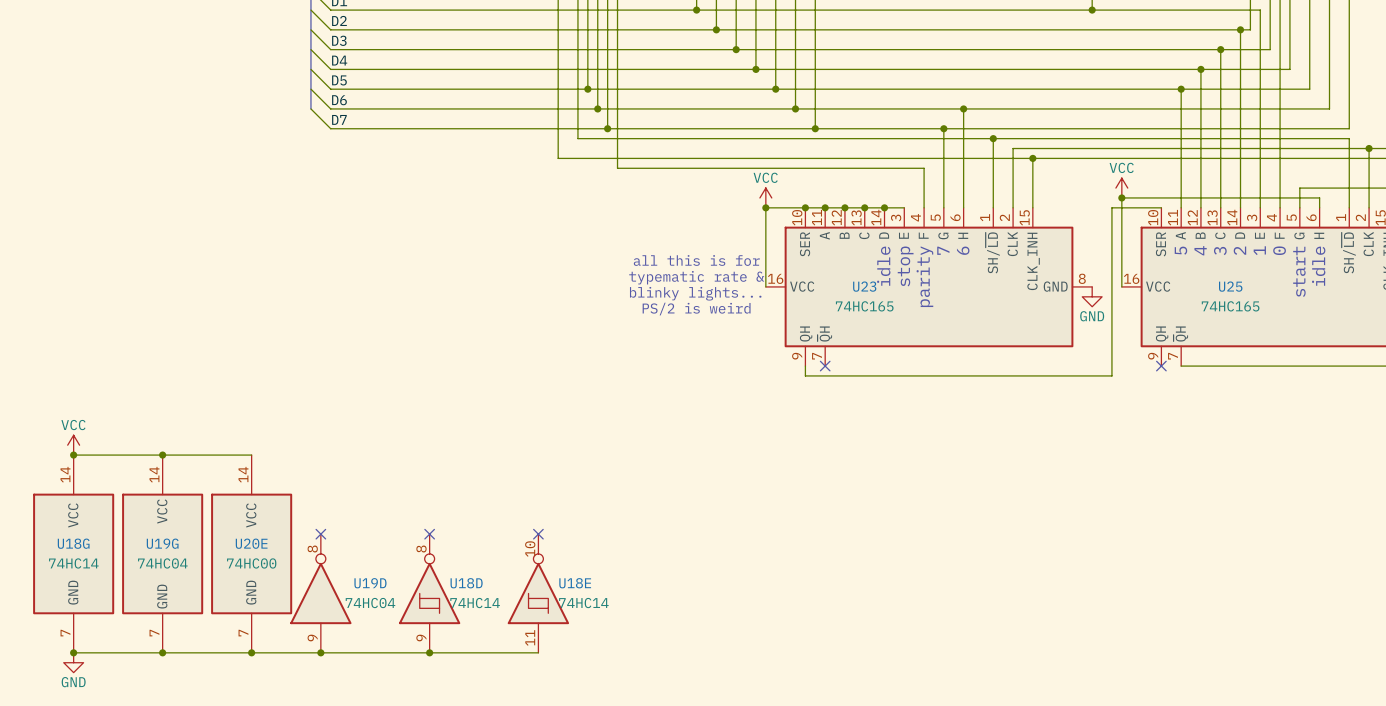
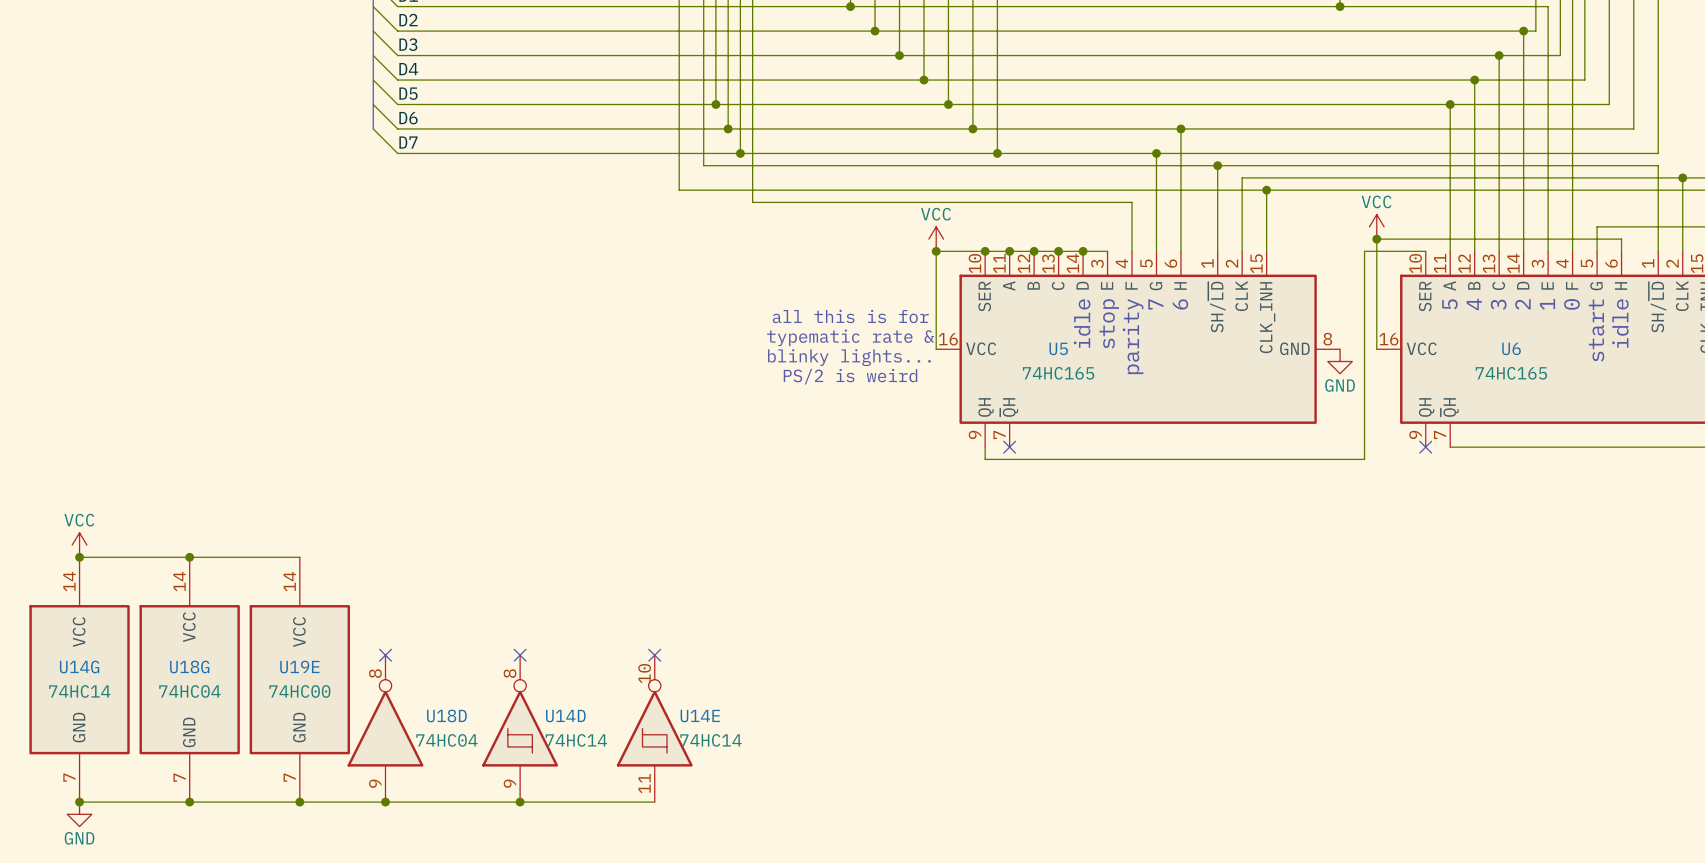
U23 name: U23 (864, 286) -> U5 (1058, 348)
U25 name: U25 (1230, 286) -> U6 (1511, 348)
U18G name: U18G (73, 543) -> U14G (79, 666)
U19G name: U19G (162, 543) -> U18G (189, 666)
U20E name: U20E (251, 543) -> U19E (299, 666)
U19D name: U19D (370, 583) -> U18D (446, 715)
U18D name: U18D (466, 583) -> U14D (565, 716)
U18E name: U18E (575, 583) -> U14E (700, 716)

